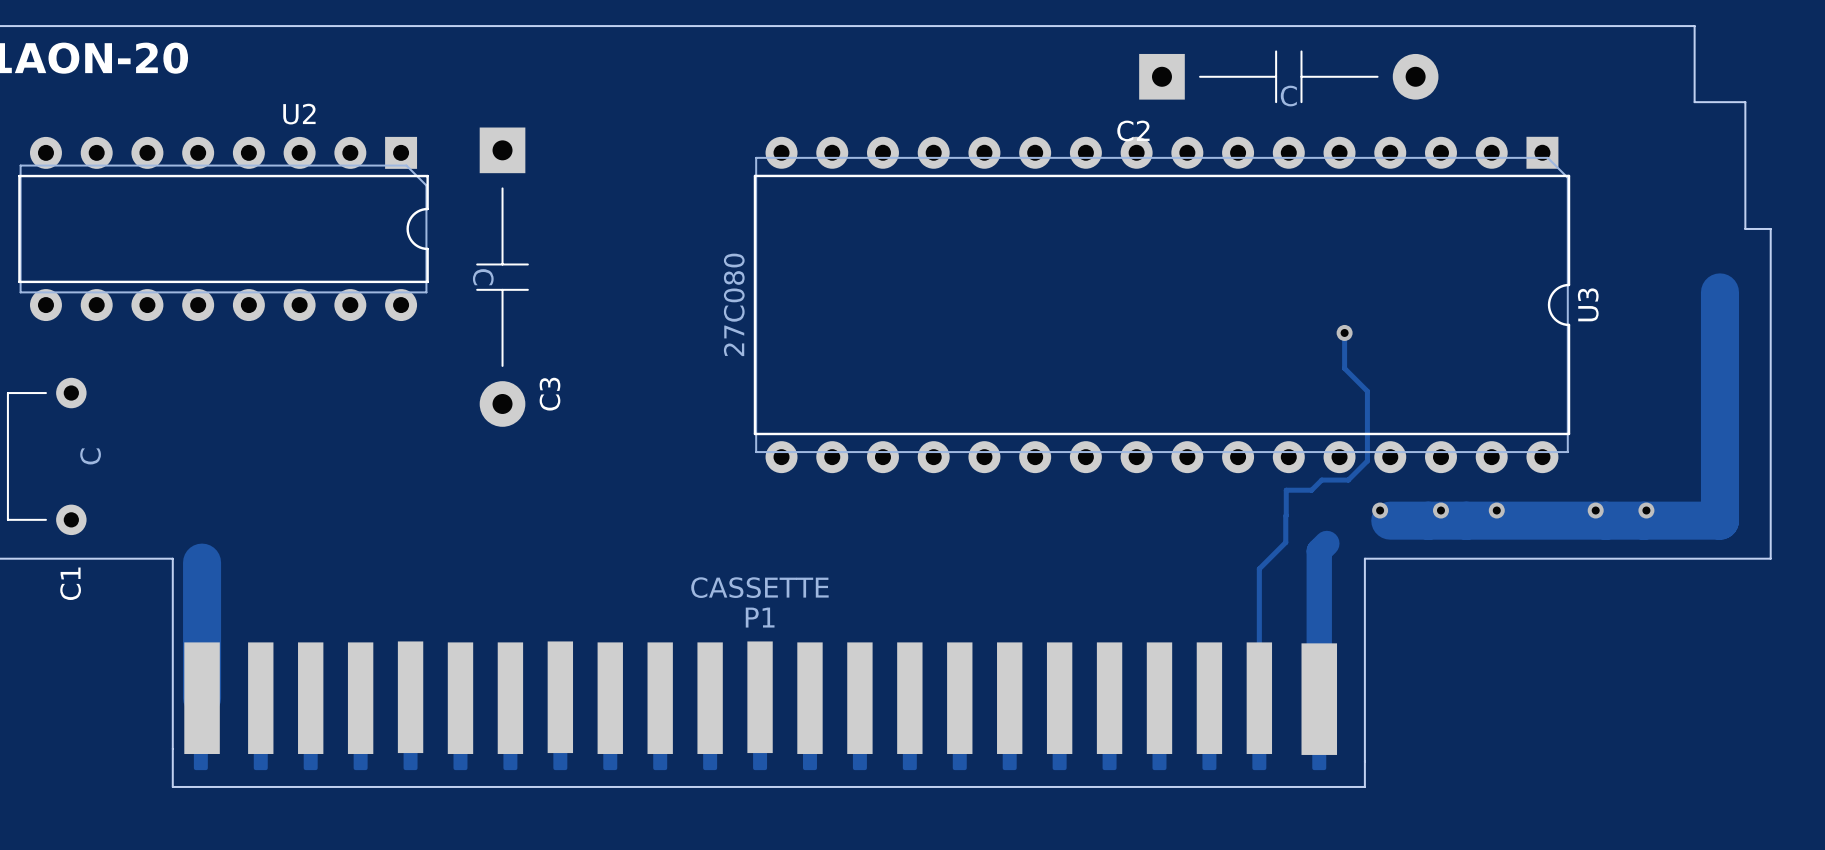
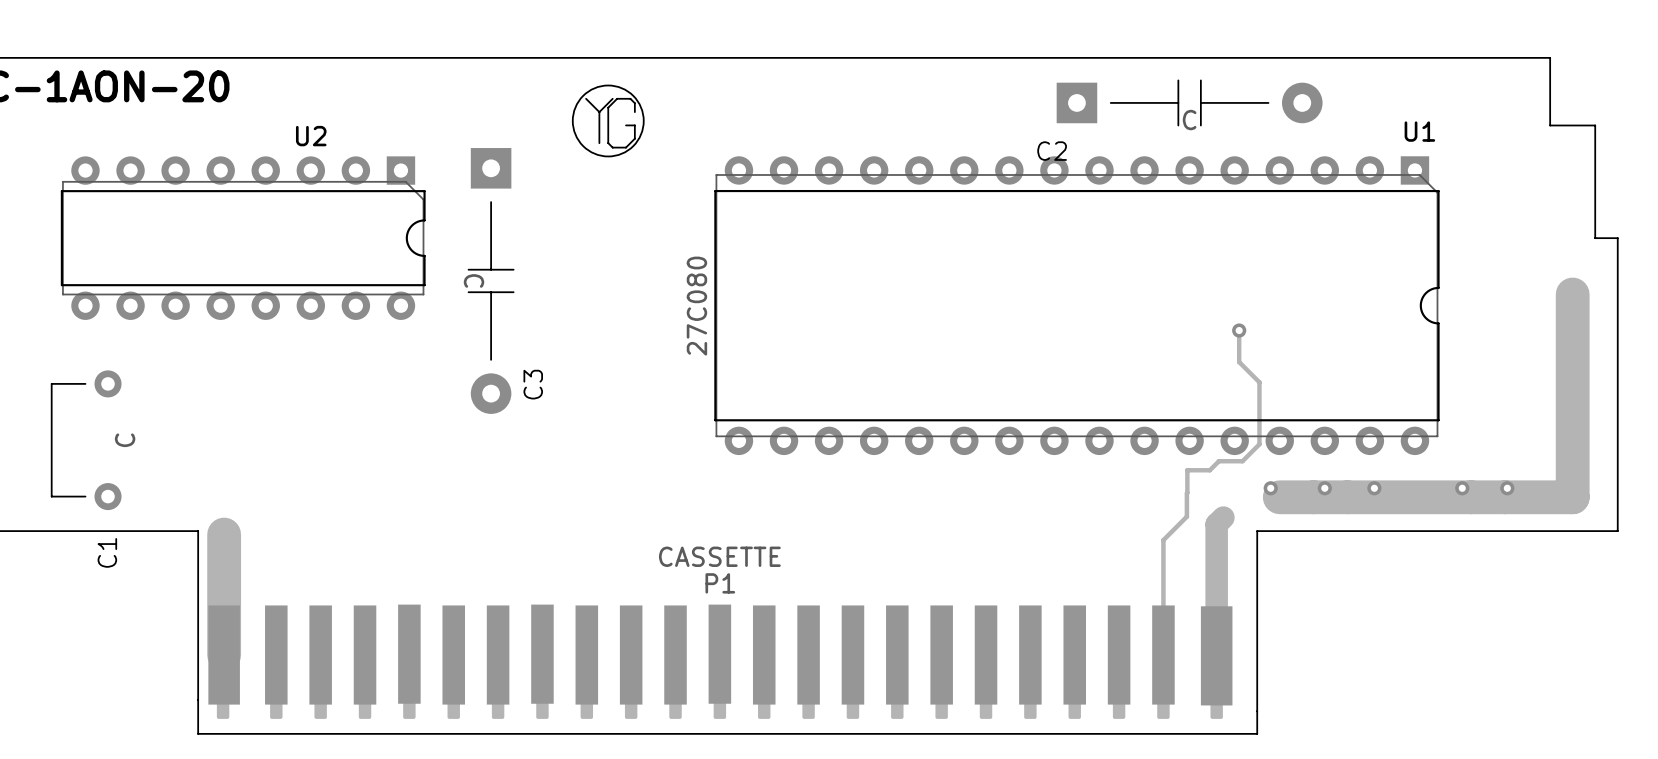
drawing: none -> [571, 84, 645, 158]
U3 name: U3 (1588, 304) -> U1 (1419, 131)

